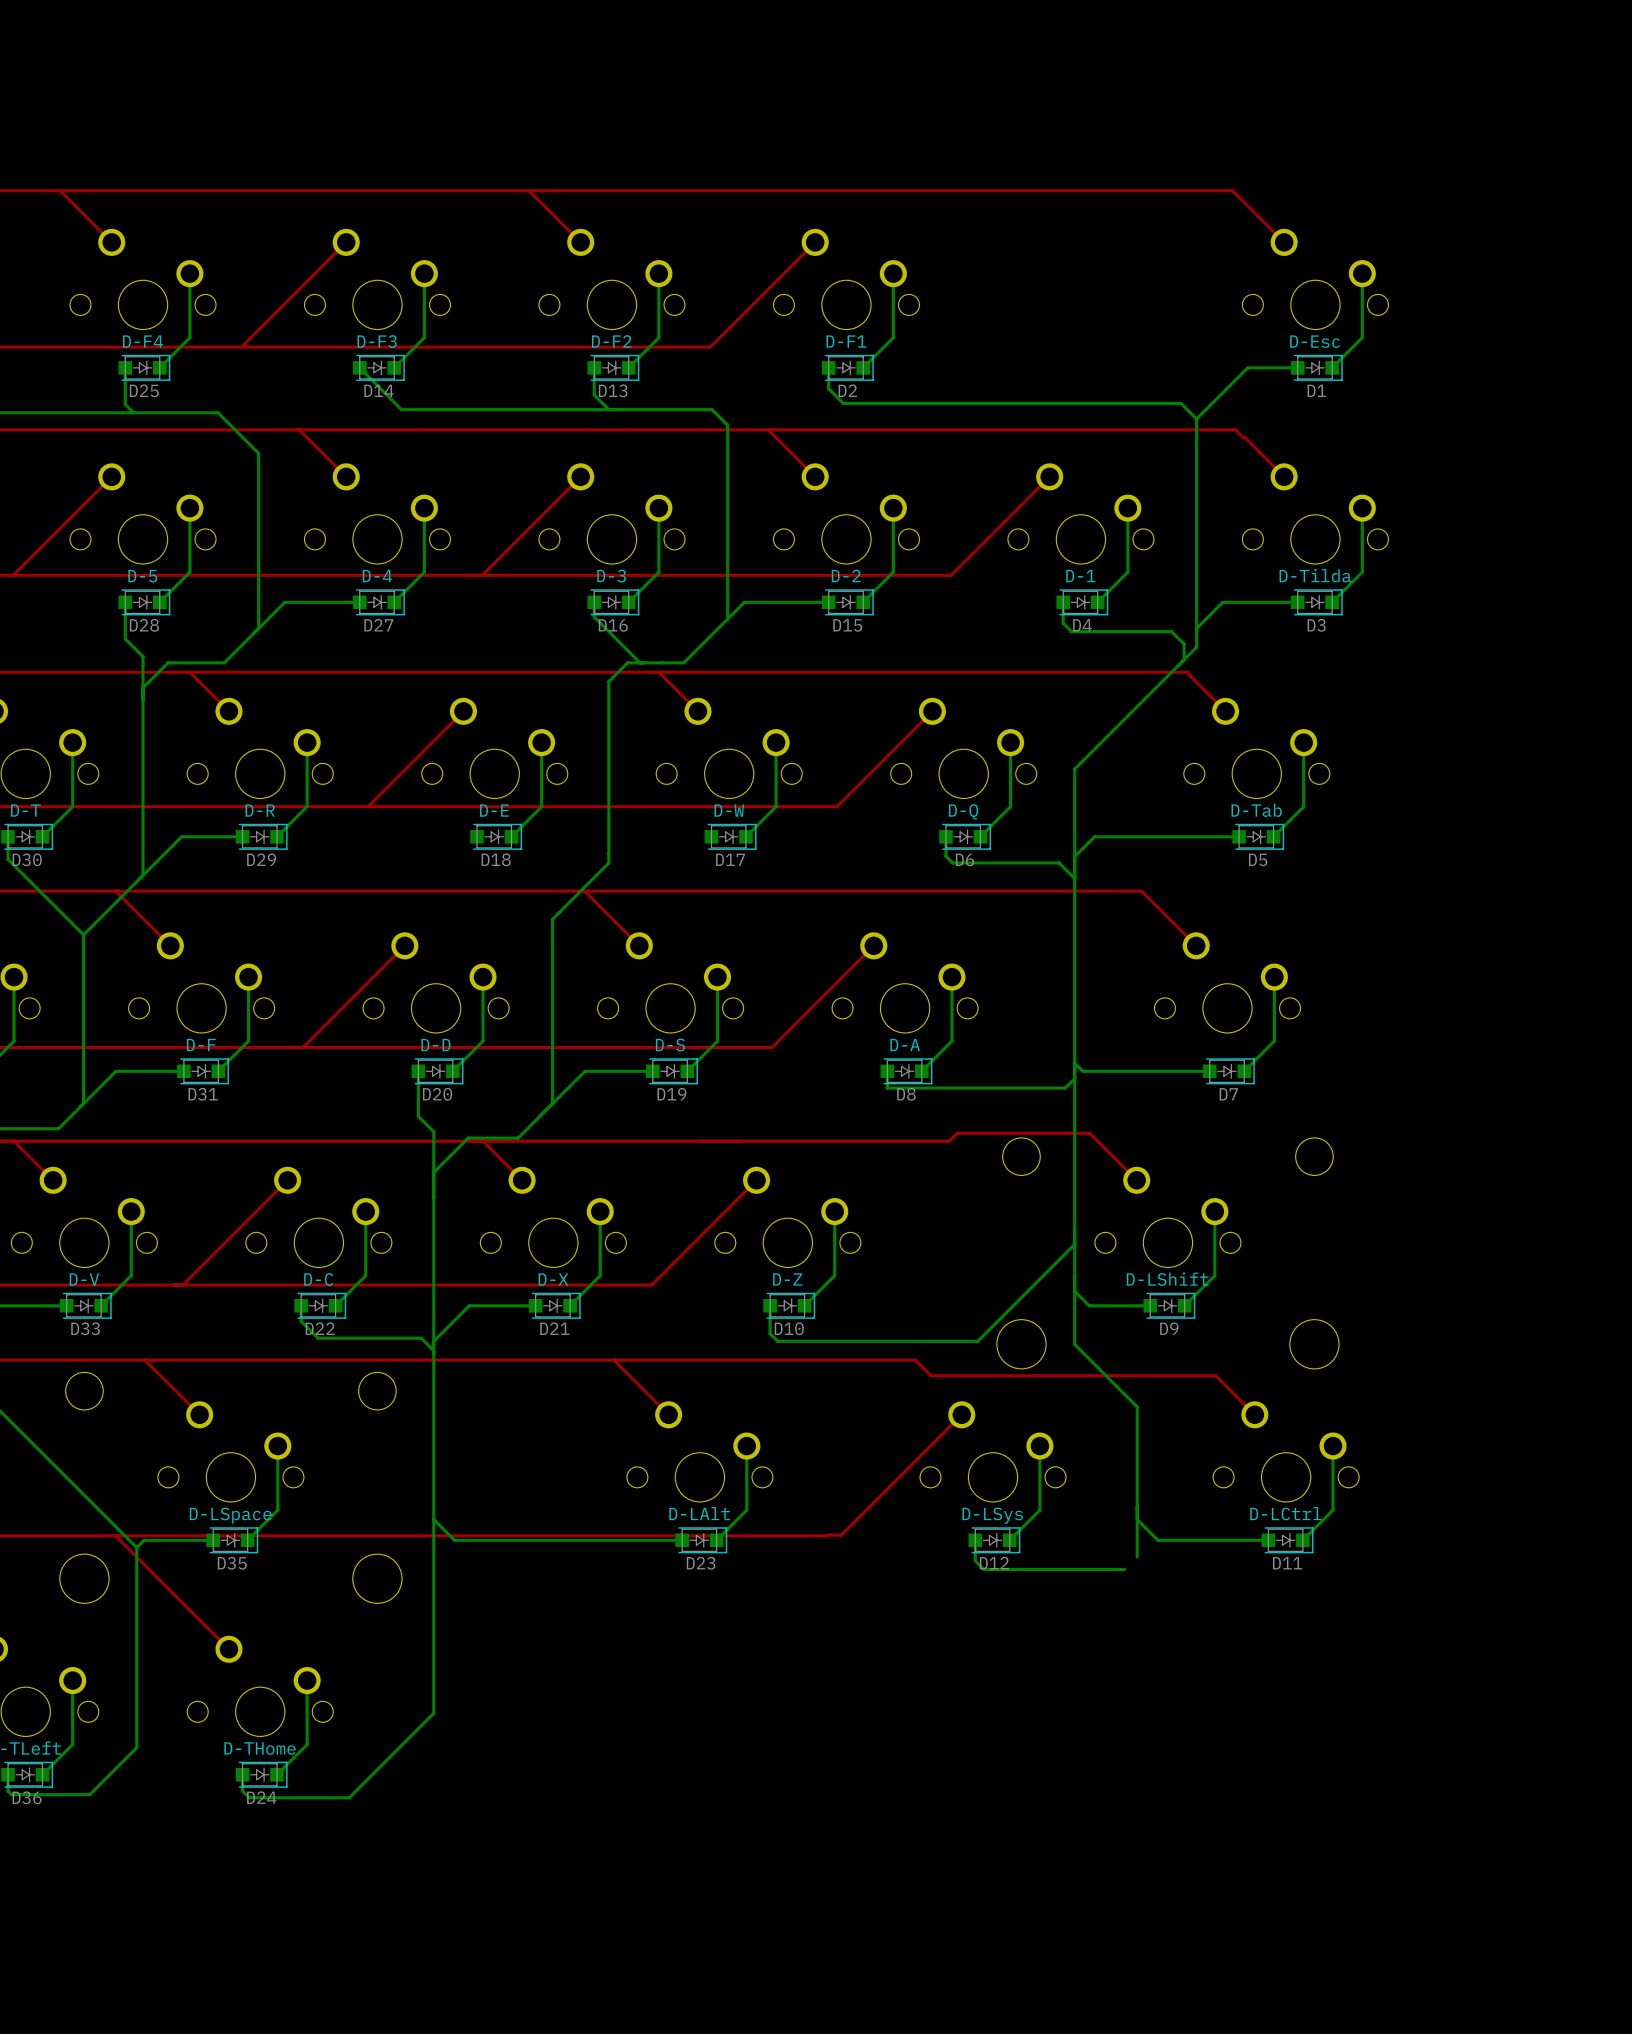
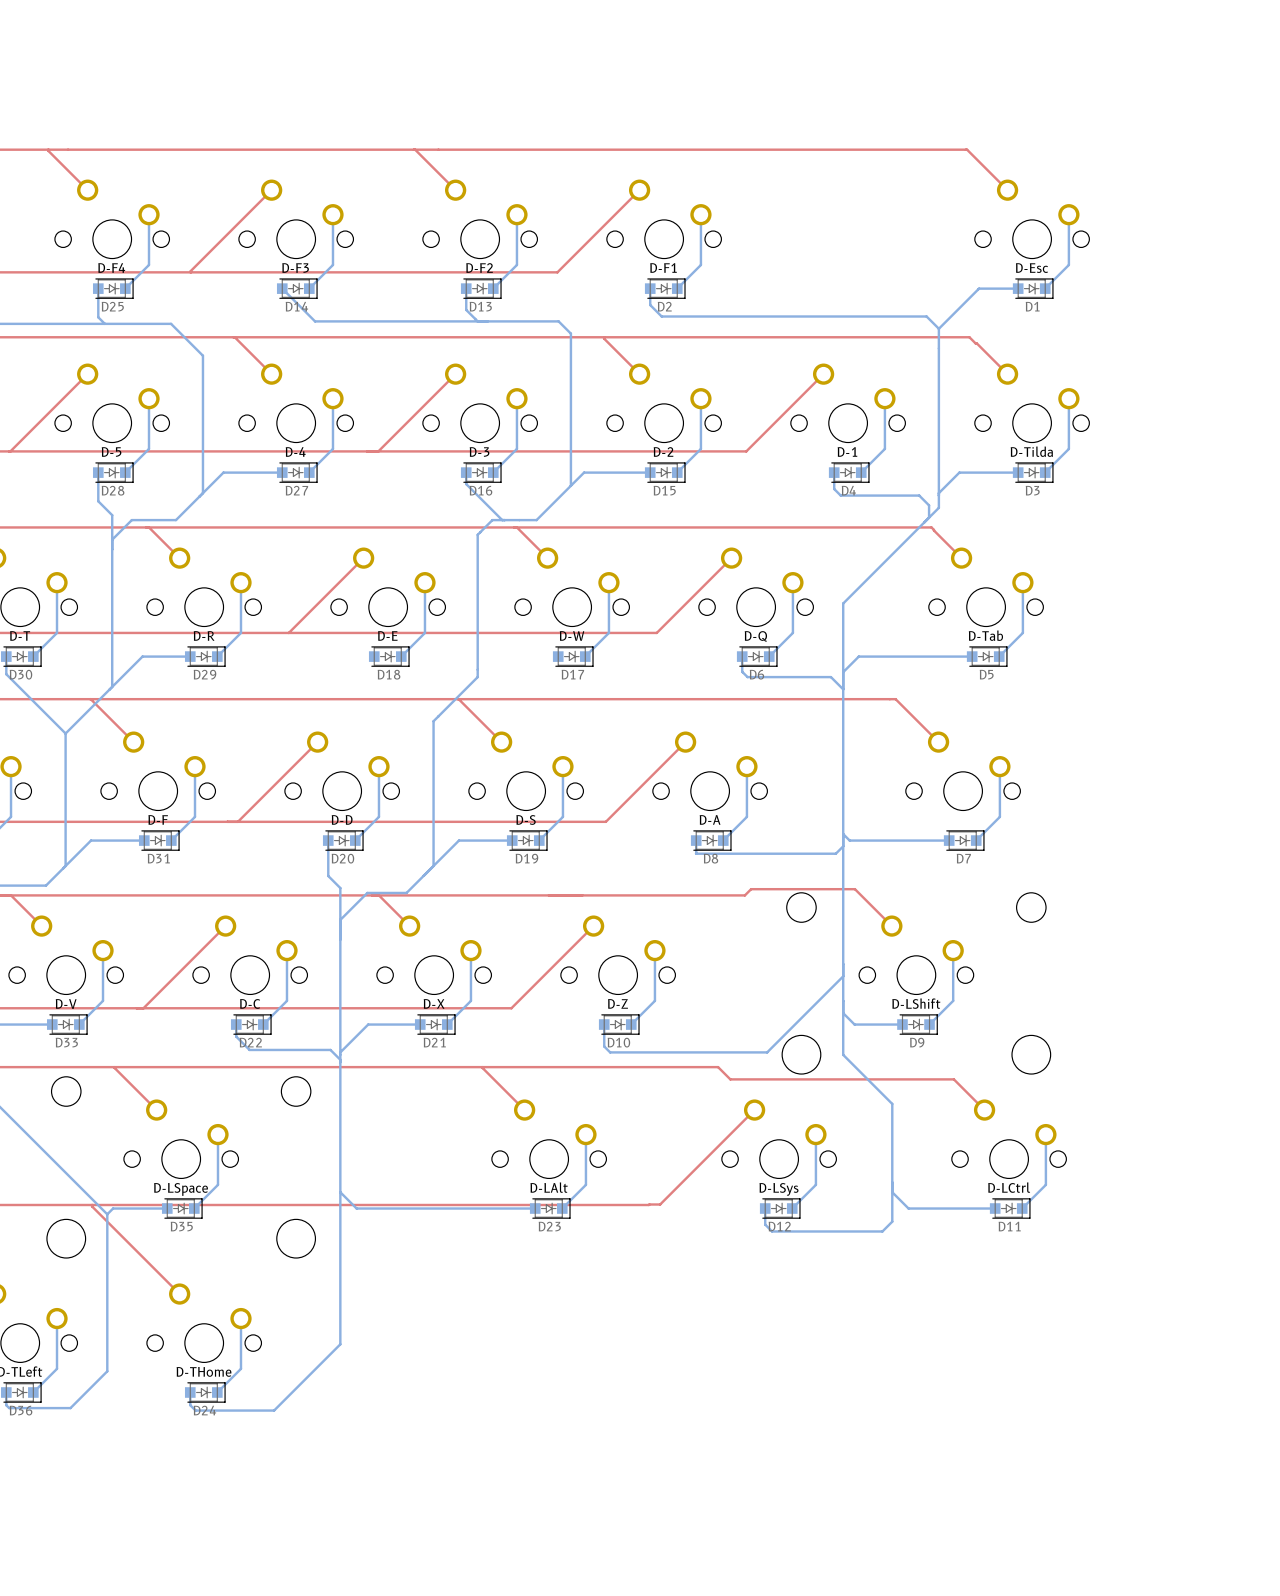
bottom track: none -> (892, 1221) (882, 1231)

